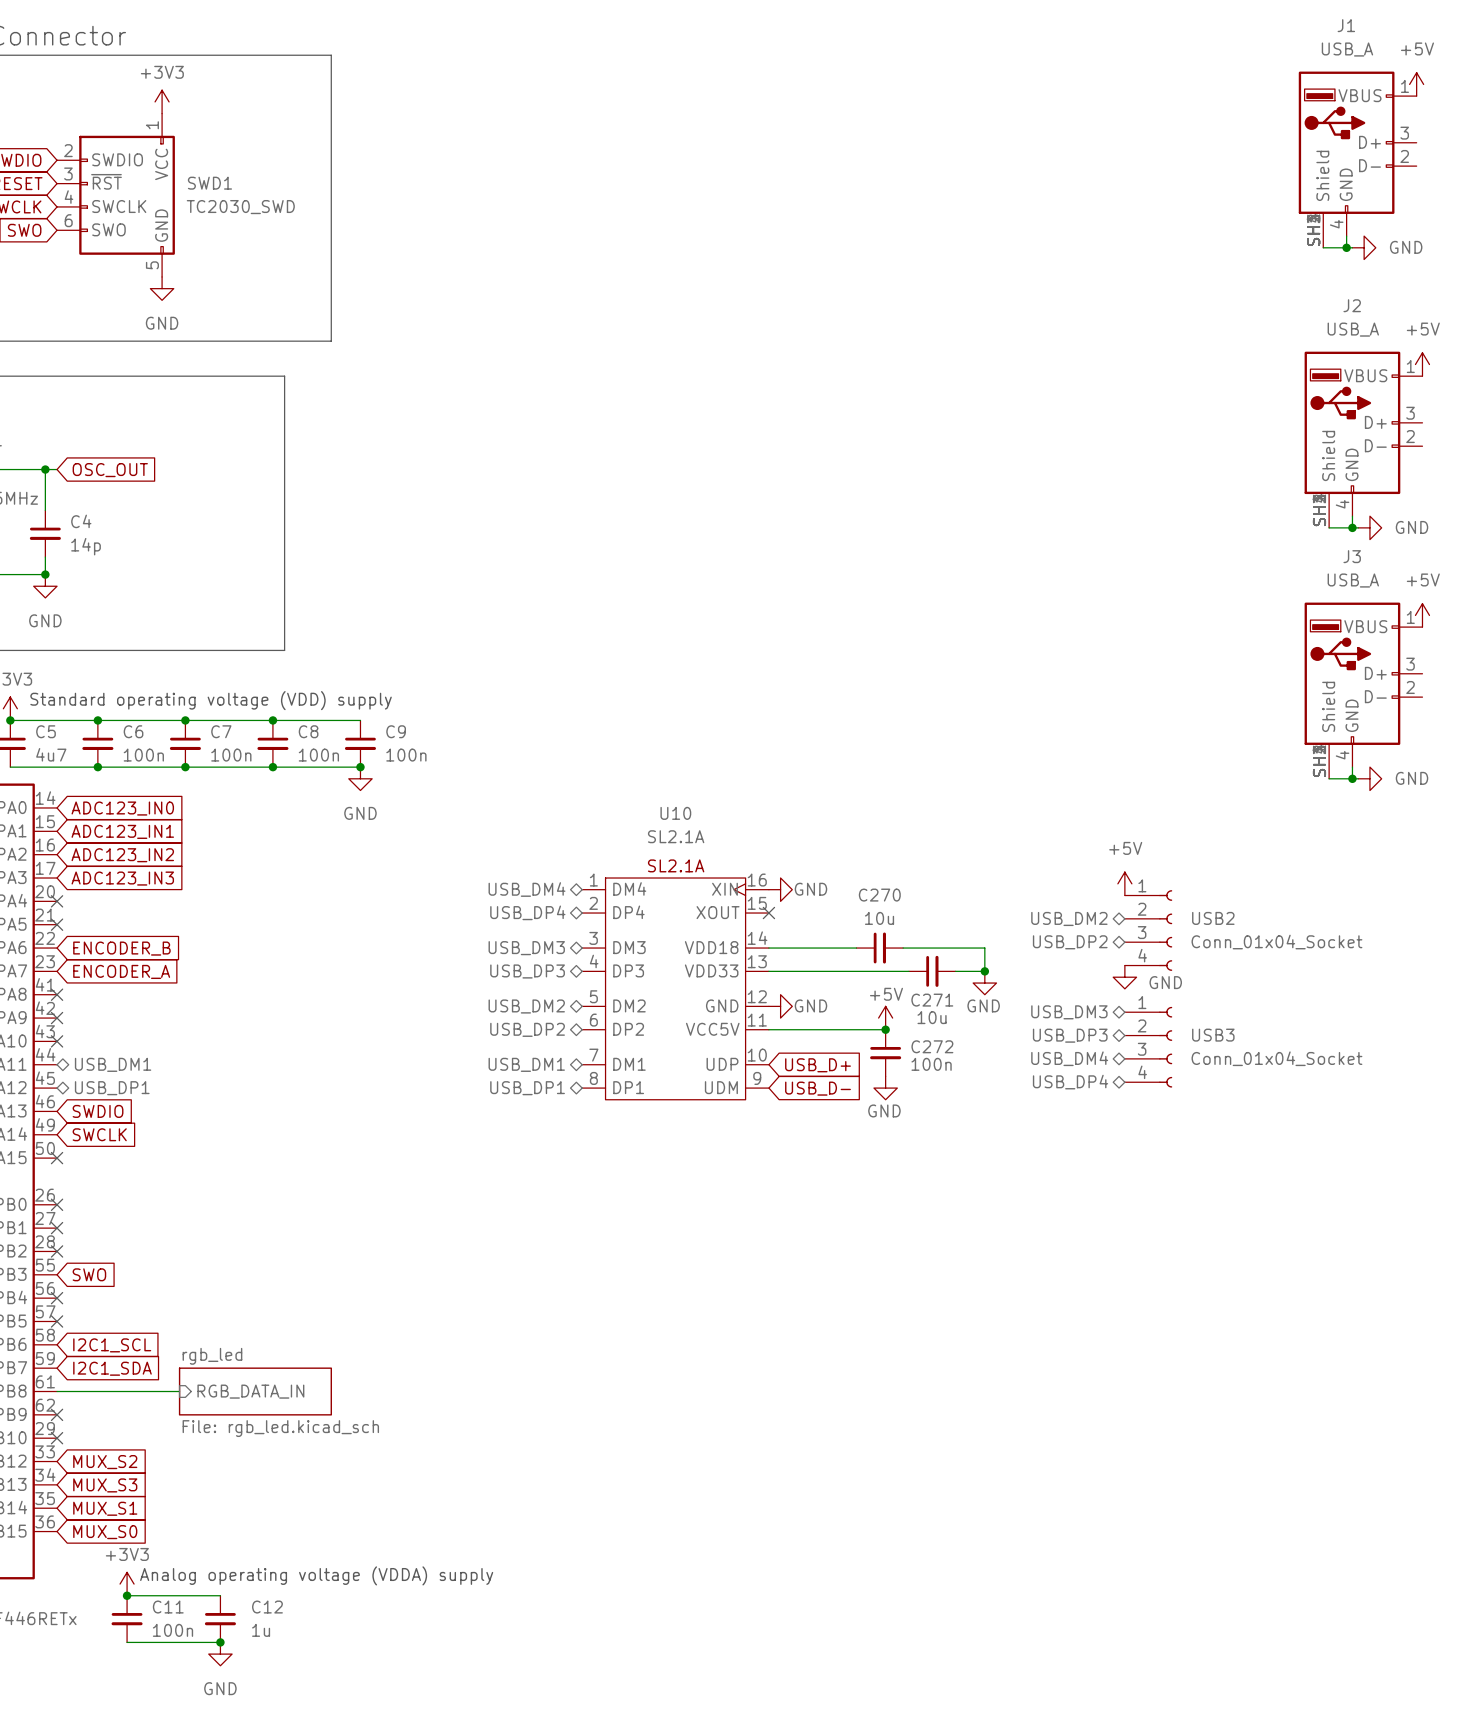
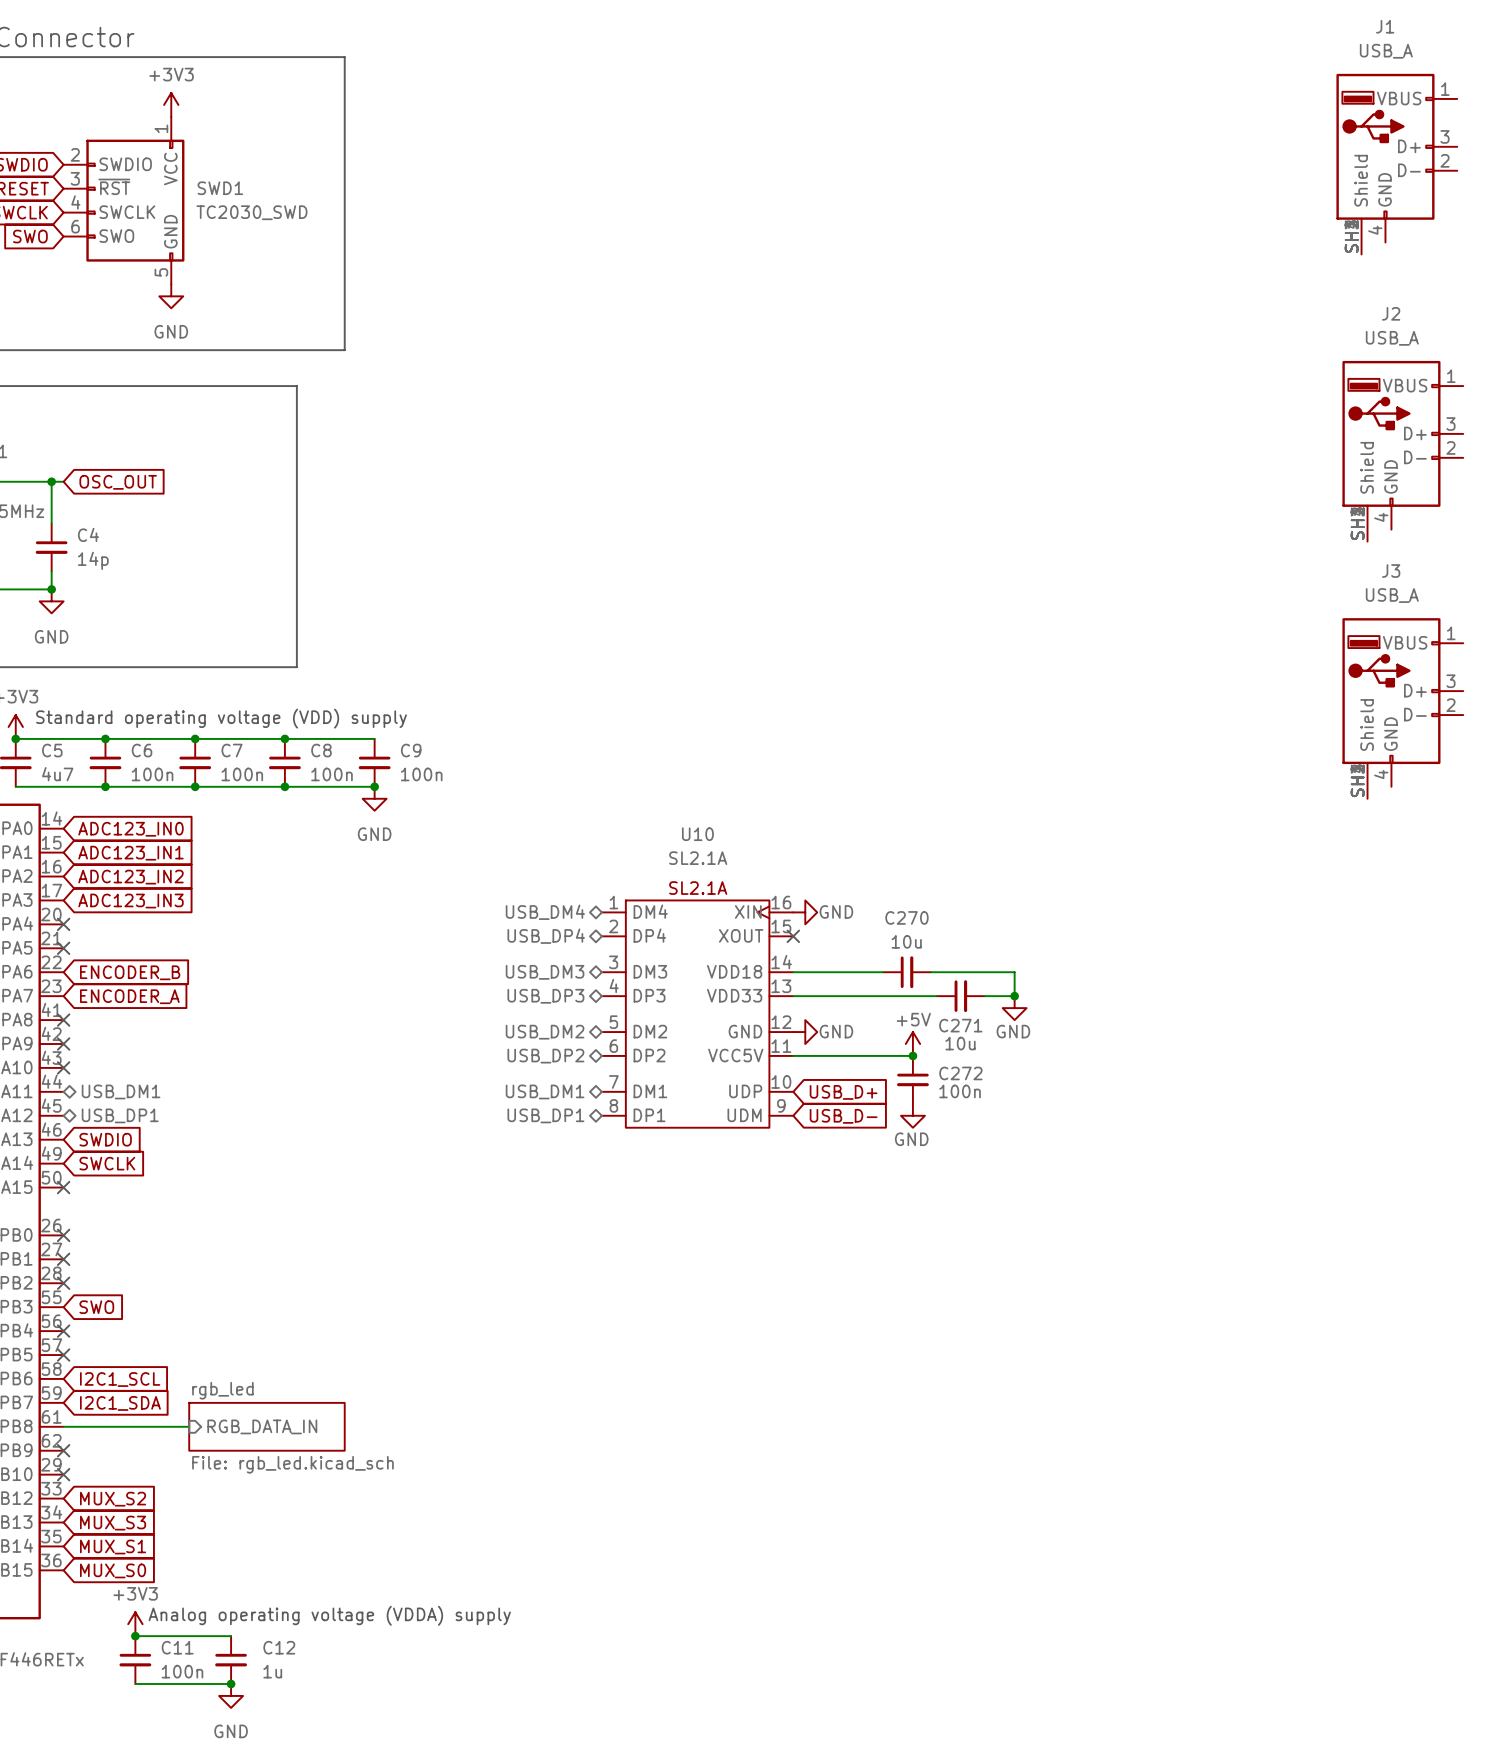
power symbol: +5V (1416, 84) -> none
wire: (1346, 236) (1346, 247) -> none
wire: (1323, 247) (1352, 247) -> none
junction: (1346, 247) -> none
power symbol: GND (1364, 247) -> none
power symbol: +5V (1422, 364) -> none
wire: (1352, 516) (1352, 527) -> none
wire: (1329, 527) (1358, 527) -> none
junction: (1352, 527) -> none
power symbol: GND (1369, 527) -> none
power symbol: +5V (1422, 615) -> none
wire: (1352, 767) (1352, 778) -> none
wire: (1329, 778) (1358, 778) -> none
junction: (1352, 778) -> none
power symbol: GND (1369, 778) -> none
power symbol: +5V (1124, 883) -> none
hierarchical label: USB_DM2 (1069, 918) -> none
USB2: Conn_01x04_Socket (1148, 930) -> none
hierarchical label: USB_DP2 (1070, 942) -> none
power symbol: GND (1124, 977) -> none
hierarchical label: USB_DM3 (1069, 1012) -> none
hierarchical label: USB_DP3 (1070, 1035) -> none
USB3: Conn_01x04_Socket (1148, 1047) -> none
hierarchical label: USB_DM4 (1069, 1058) -> none
hierarchical label: USB_DP4 (1070, 1082) -> none

